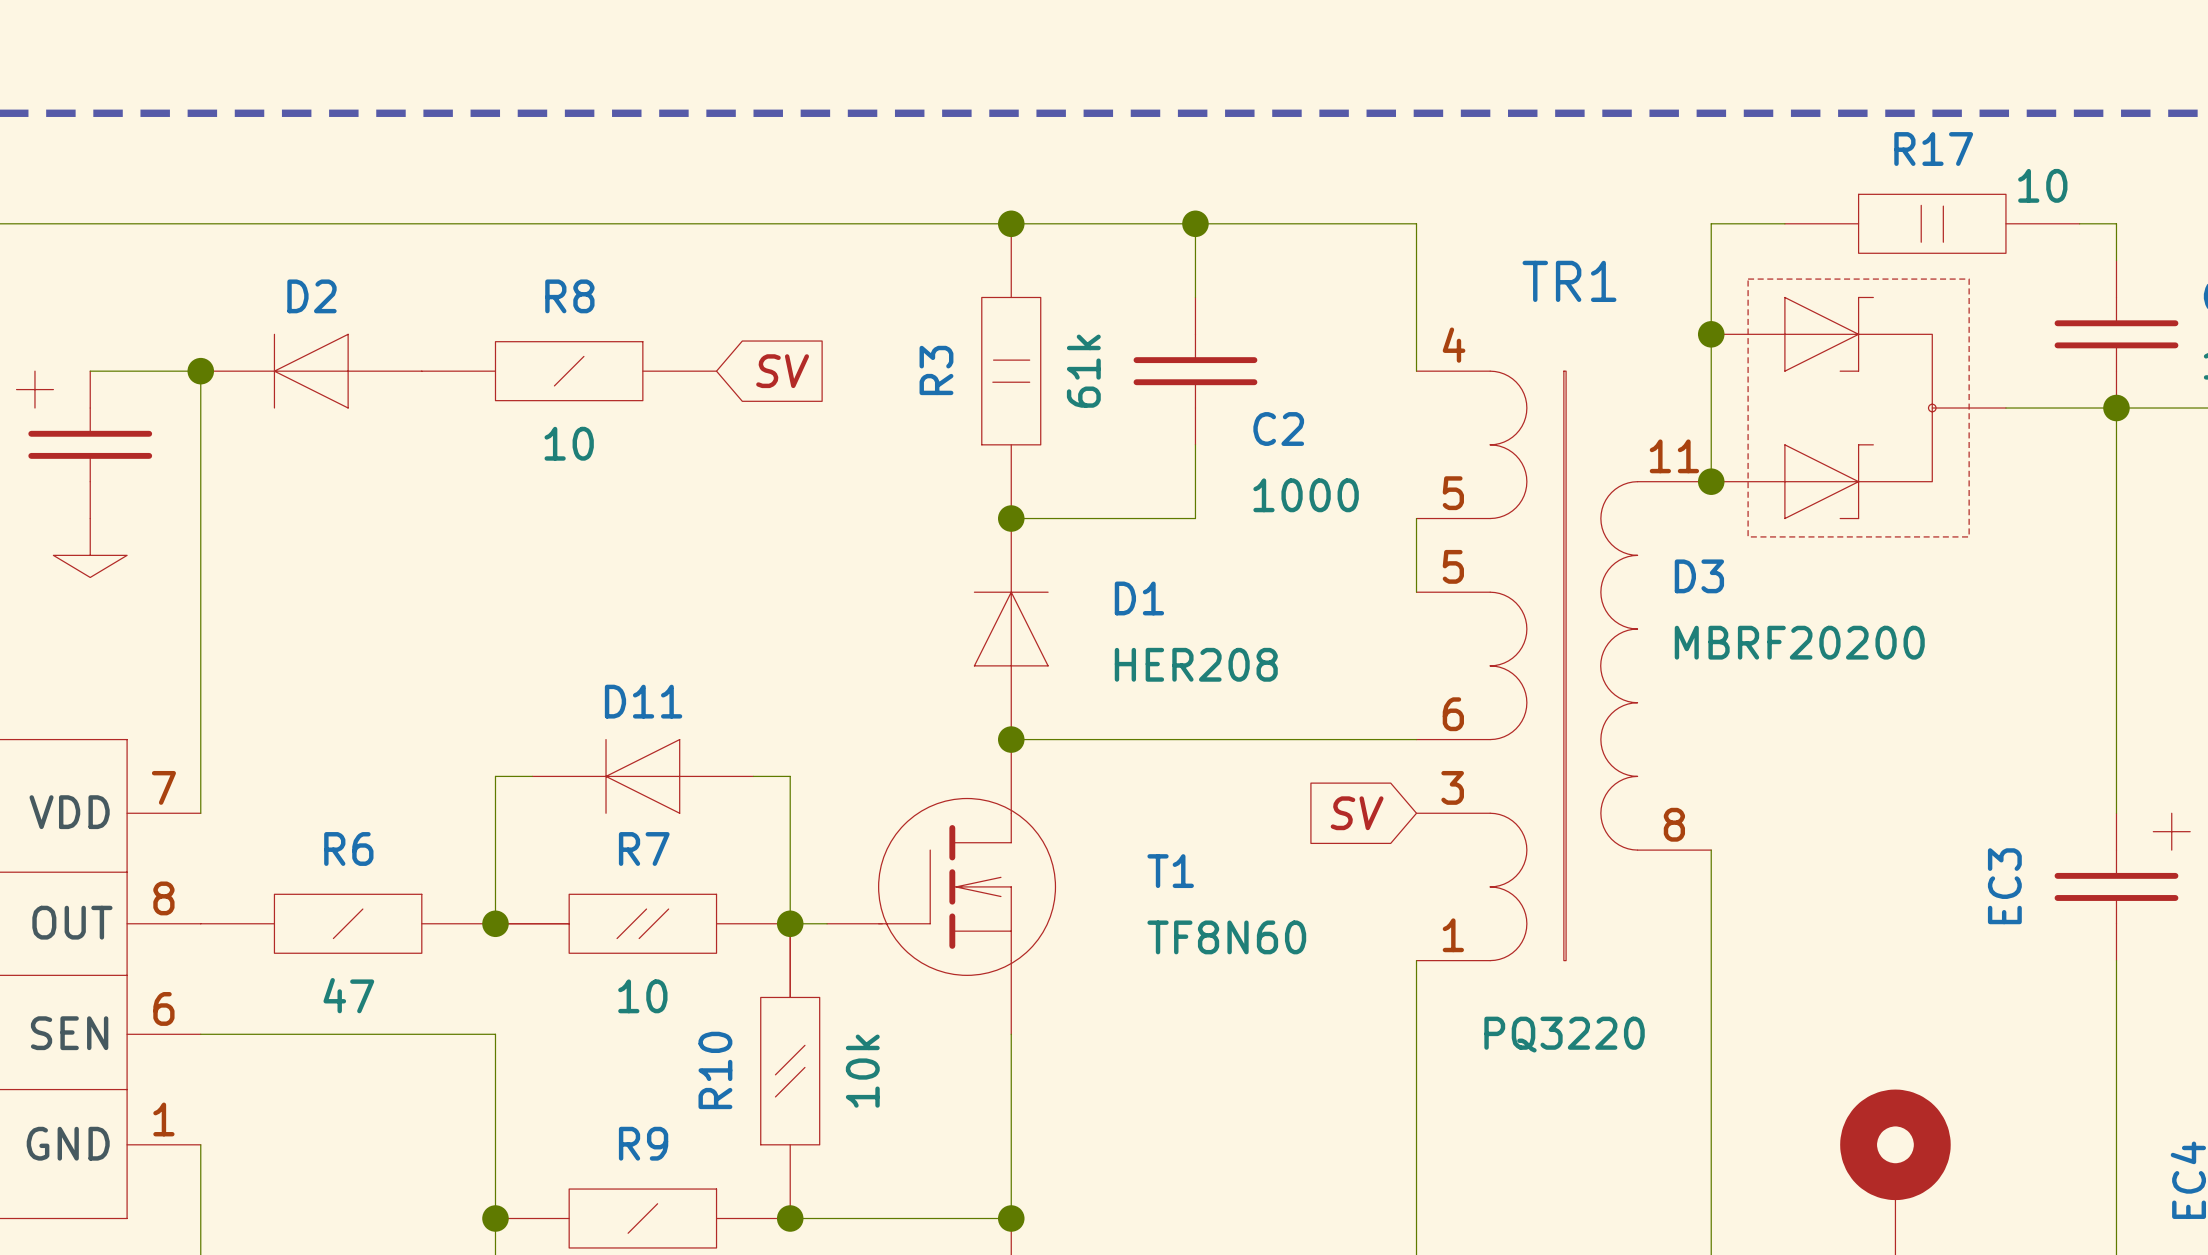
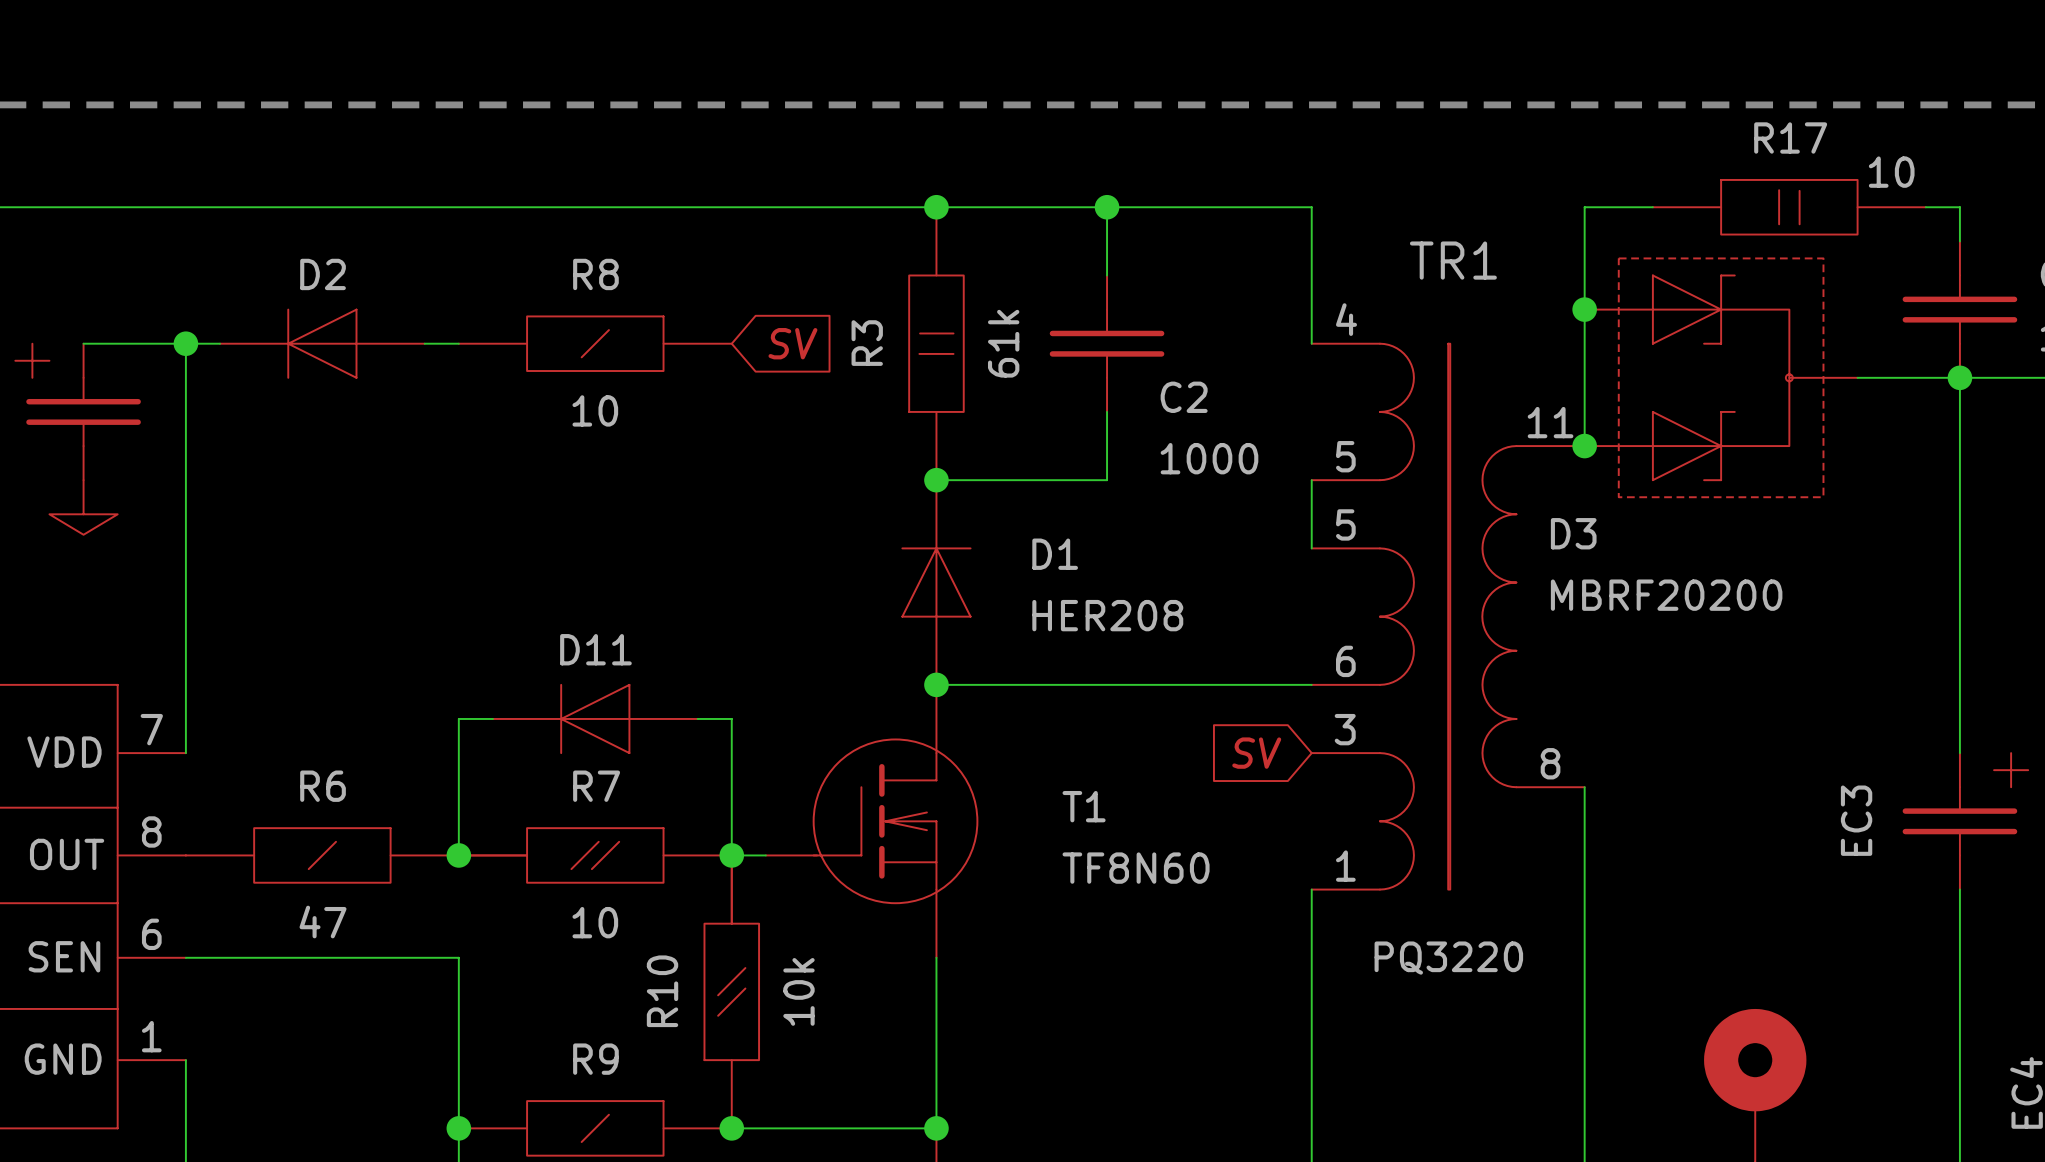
D2 position: (311, 371) -> (322, 343)
R8 position: (569, 371) -> (595, 343)
global label position: SV (782, 371) -> SV (792, 343)

